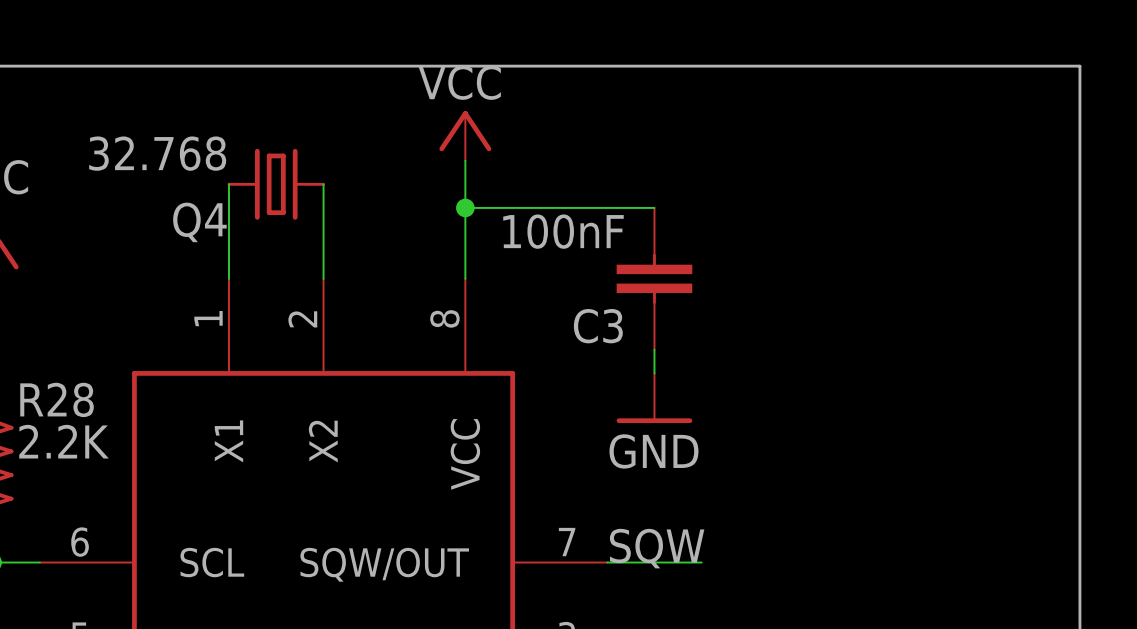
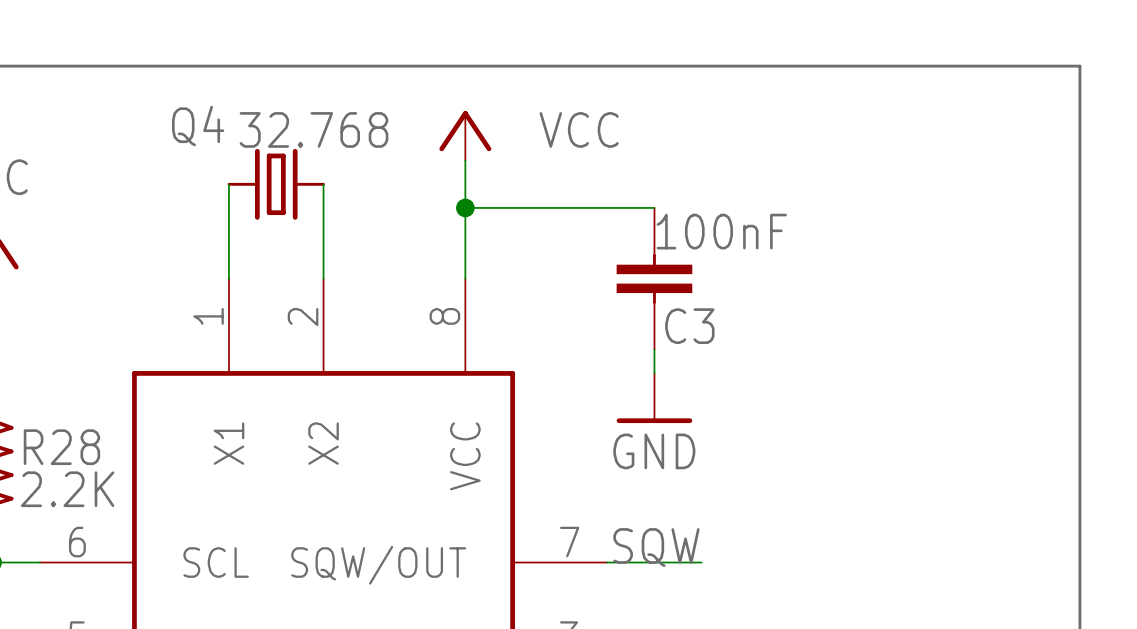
power symbol text position: VCC (459, 82) -> VCC (579, 129)
Q4 value position: 32.768 (157, 153) -> 32.768 (313, 129)
Q4 name position: Q4 (199, 222) -> Q4 (198, 126)
C3 value position: 100nF (563, 231) -> 100nF (721, 231)
C3 name position: C3 (598, 326) -> C3 (689, 326)
R28 name position: R28 (57, 399) -> R28 (61, 447)
R28 value position: 2.2K (64, 441) -> 2.2K (67, 489)

